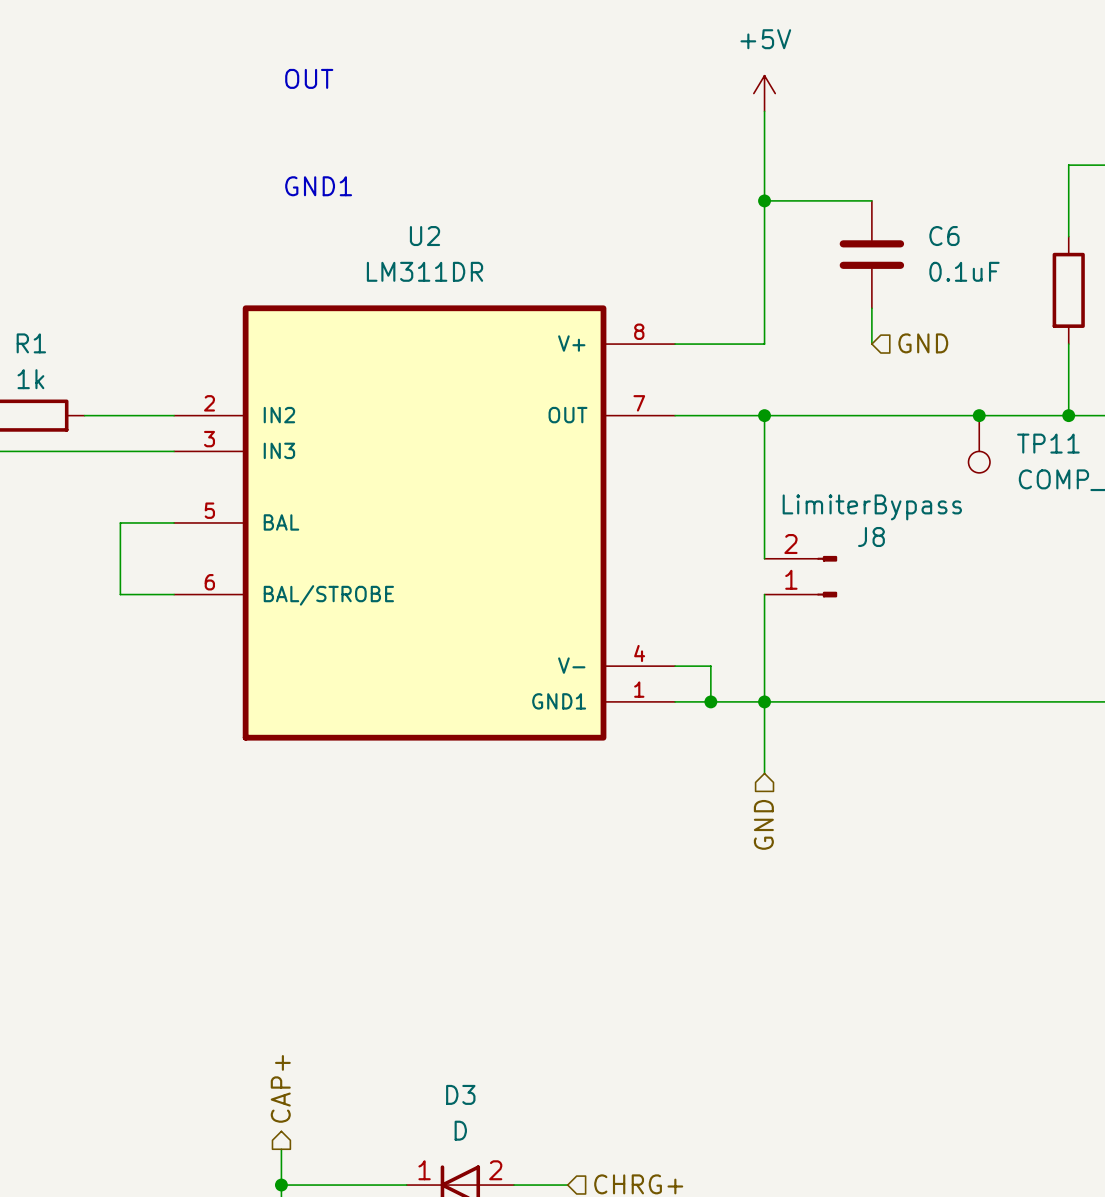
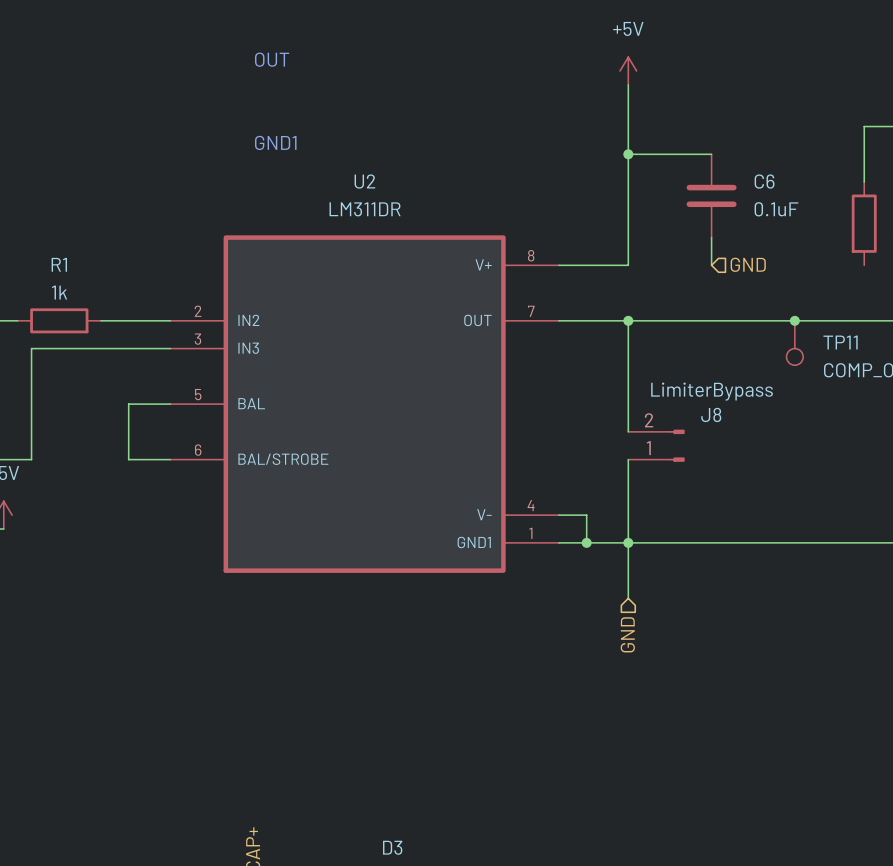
wire: (1068, 344) (1068, 415) -> none
junction: (1068, 415) -> none

